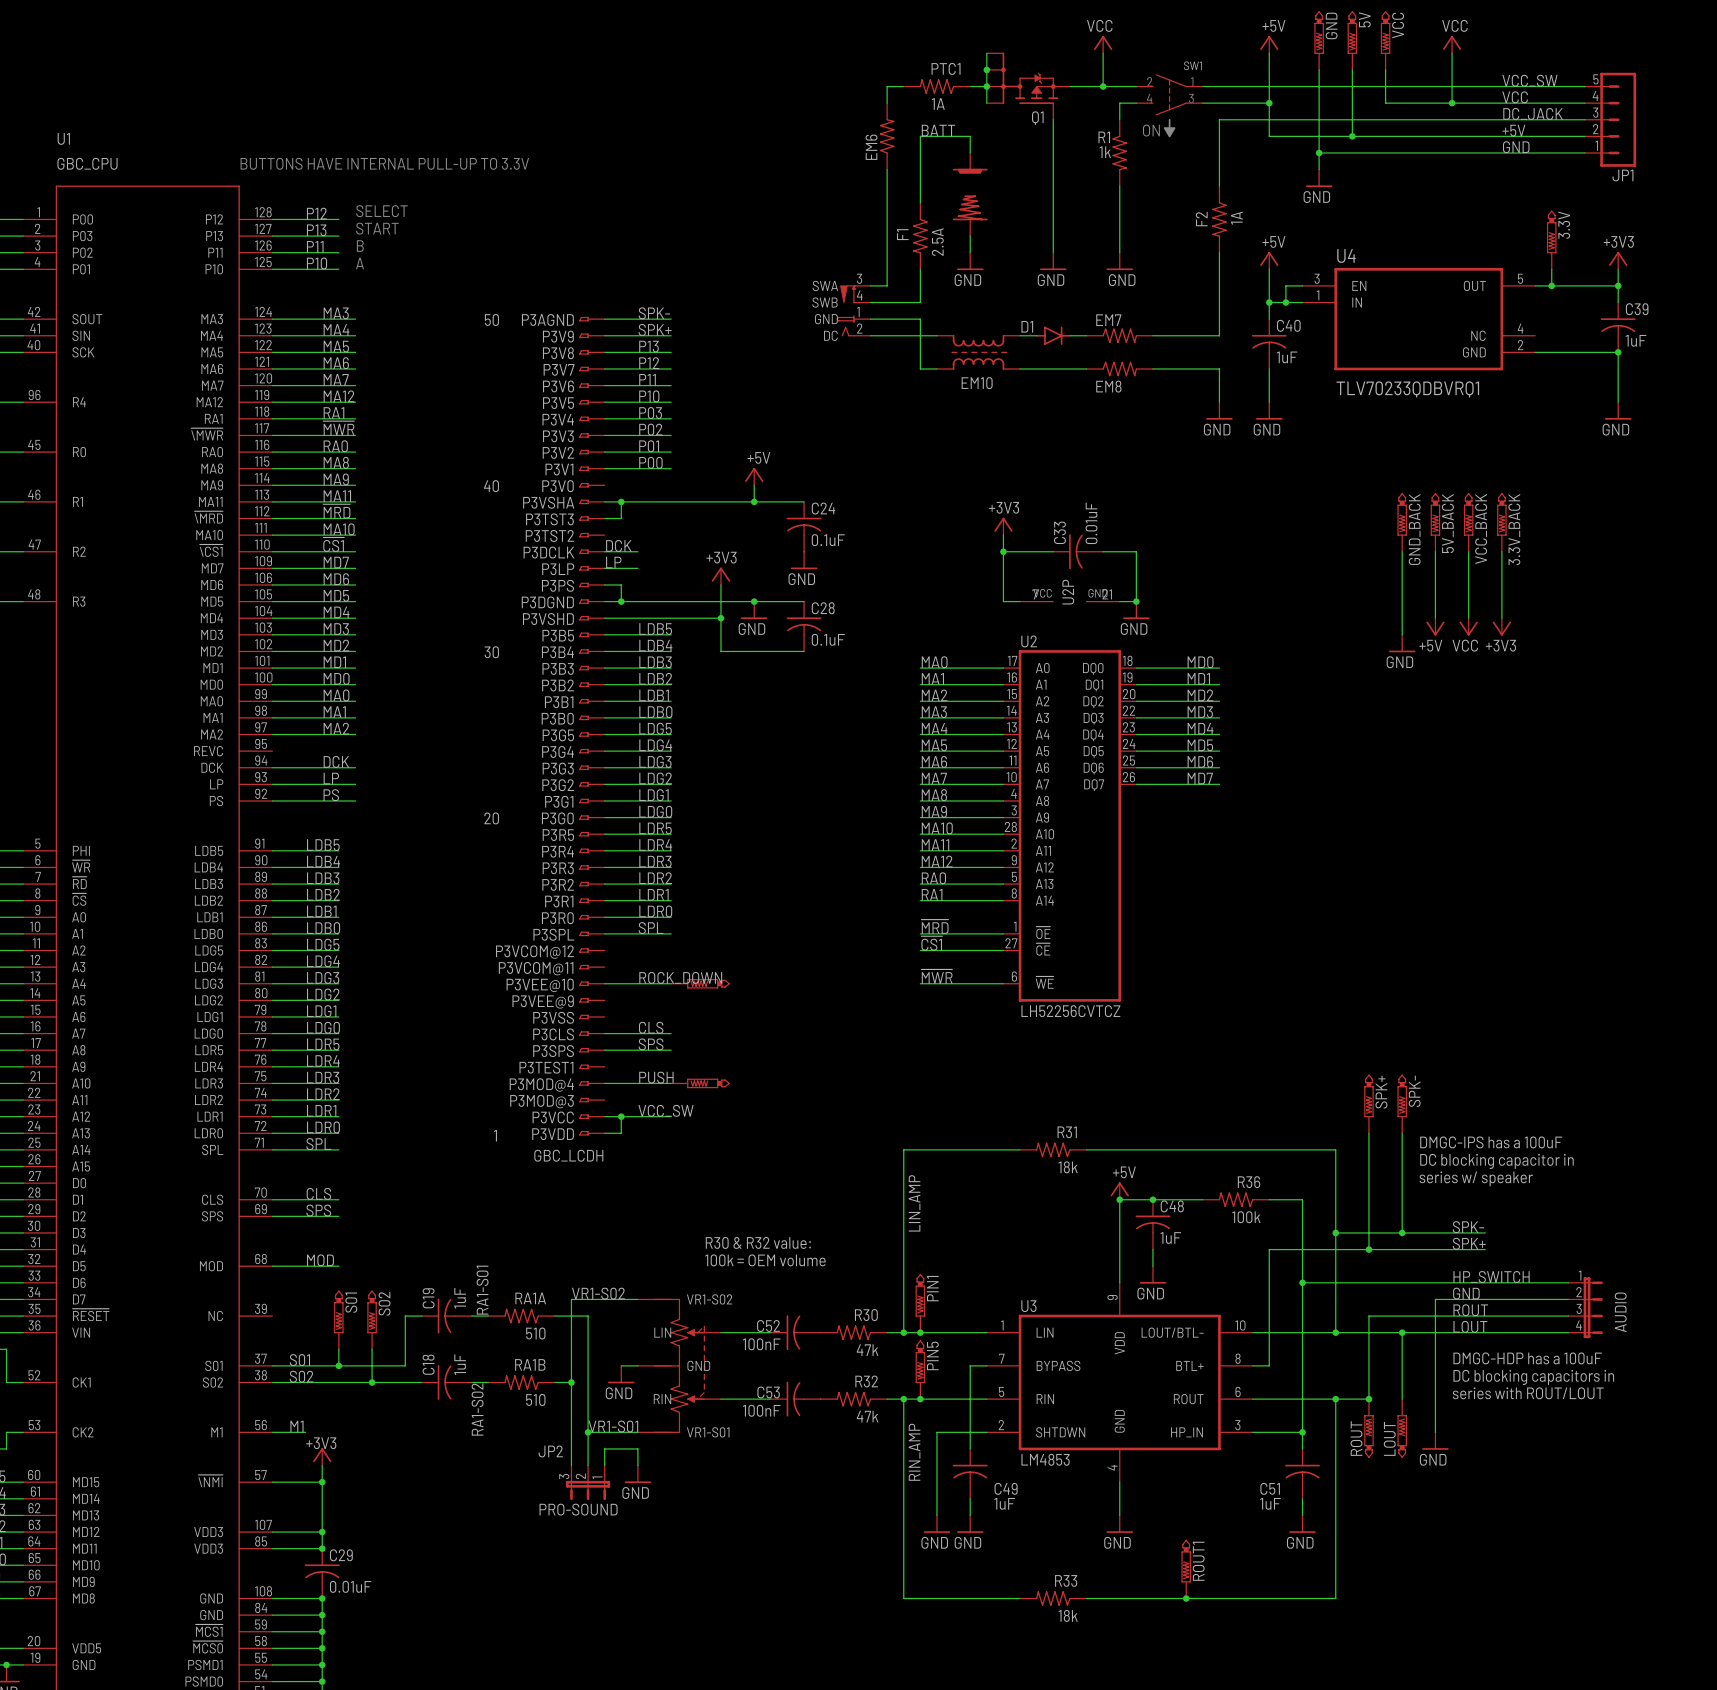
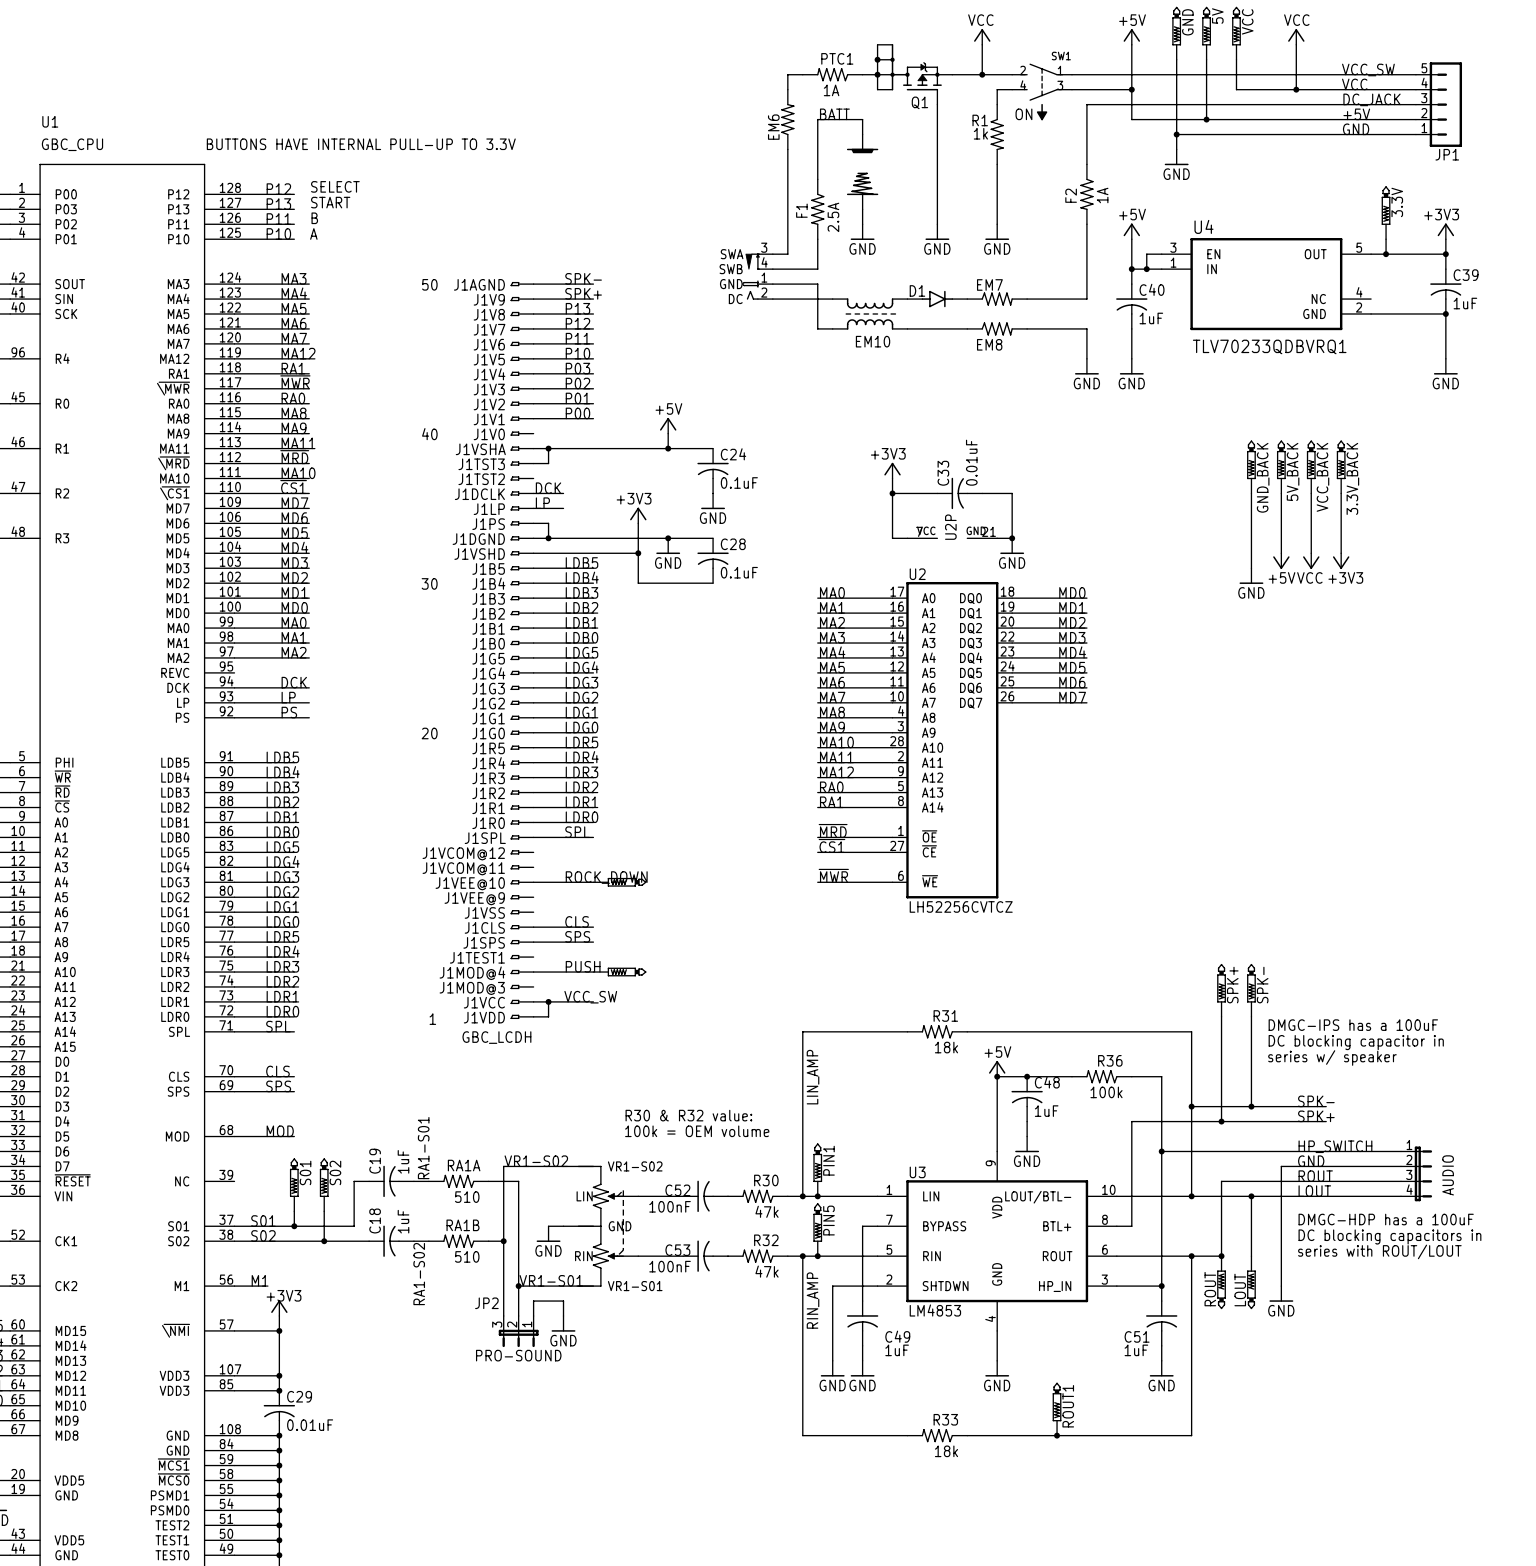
P3AGND name: P3AGND (547, 319) -> J1AGND (479, 284)
P3V9 name: P3V9 (558, 336) -> J1V9 (489, 299)
P3V8 name: P3V8 (558, 353) -> J1V8 (489, 314)
P3V7 name: P3V7 (559, 369) -> J1V7 (489, 329)
P3V6 name: P3V6 (558, 386) -> J1V6 (489, 344)
P3V5 name: P3V5 (558, 403) -> J1V5 (489, 359)
P3V4 name: P3V4 (558, 419) -> J1V4 (489, 374)
P3V3 name: P3V3 (558, 436) -> J1V3 (489, 389)
P3V2 name: P3V2 (558, 452) -> J1V2 (489, 404)
P3V1 name: P3V1 (559, 469) -> J1V1 (489, 419)
P3V0 name: P3V0 (557, 486) -> J1V0 (489, 434)
P3VSHA name: P3VSHA (548, 502) -> J1VSHA (480, 449)
P3TST3 name: P3TST3 (549, 519) -> J1TST3 (481, 464)
P3TST2 name: P3TST2 (549, 535) -> J1TST2 (481, 479)
P3DCLK name: P3DCLK (548, 552) -> J1DCLK (479, 494)
P3LP name: P3LP (558, 569) -> J1LP (489, 509)
P3PS name: P3PS (557, 585) -> J1PS (488, 524)
P3DGND name: P3DGND (547, 602) -> J1DGND (478, 539)
P3VSHD name: P3VSHD (548, 619) -> J1VSHD (479, 554)
P3B5 name: P3B5 (558, 635) -> J1B5 (488, 568)
P3B4 name: P3B4 (557, 652) -> J1B4 (488, 583)
P3B3 name: P3B3 (558, 668) -> J1B3 (488, 598)
P3B2 name: P3B2 (558, 685) -> J1B2 (488, 613)
P3B1 name: P3B1 (559, 702) -> J1B1 (488, 628)
P3B0 name: P3B0 (557, 718) -> J1B0 (488, 643)
P3G5 name: P3G5 (558, 735) -> J1G5 (488, 658)
P3G4 name: P3G4 (557, 751) -> J1G4 (488, 673)
P3G3 name: P3G3 (558, 768) -> J1G3 (488, 688)
P3G2 name: P3G2 (558, 785) -> J1G2 (488, 703)
P3G1 name: P3G1 (559, 801) -> J1G1 (488, 718)
P3G0 name: P3G0 (557, 818) -> J1G0 (488, 733)
P3R5 name: P3R5 (558, 835) -> J1R5 (488, 748)
P3R4 name: P3R4 (558, 851) -> J1R4 (488, 763)
P3R3 name: P3R3 (558, 868) -> J1R3 (488, 778)
P3R2 name: P3R2 (558, 884) -> J1R2 (488, 793)
P3R1 name: P3R1 (559, 901) -> J1R1 (488, 808)
P3R0 name: P3R0 (557, 918) -> J1R0 (488, 823)
P3SPL name: P3SPL (553, 934) -> J1SPL (485, 838)
P3VCOM@12 name: P3VCOM@12 (534, 952) -> J1VCOM@12 (463, 853)
P3VCOM@11 name: P3VCOM@11 (536, 968) -> J1VCOM@11 (463, 868)
P3VEE@10 name: P3VEE@10 (540, 985) -> J1VEE@10 (470, 883)
P3VEE@9 name: P3VEE@9 (543, 1001) -> J1VEE@9 (474, 898)
P3VSS name: P3VSS (553, 1017) -> J1VSS (484, 912)
P3CLS name: P3CLS (553, 1034) -> J1CLS (484, 927)
P3SPS name: P3SPS (553, 1051) -> J1SPS (484, 942)
P3TEST1 name: P3TEST1 (546, 1067) -> J1TEST1 (477, 957)
P3MOD@4 name: P3MOD@4 (541, 1084) -> J1MOD@4 (472, 973)
P3MOD@3 name: P3MOD@3 (542, 1101) -> J1MOD@3 (472, 988)
P3VCC name: P3VCC (553, 1117) -> J1VCC (484, 1002)
P3VDD name: P3VDD (553, 1134) -> J1VDD (484, 1017)

